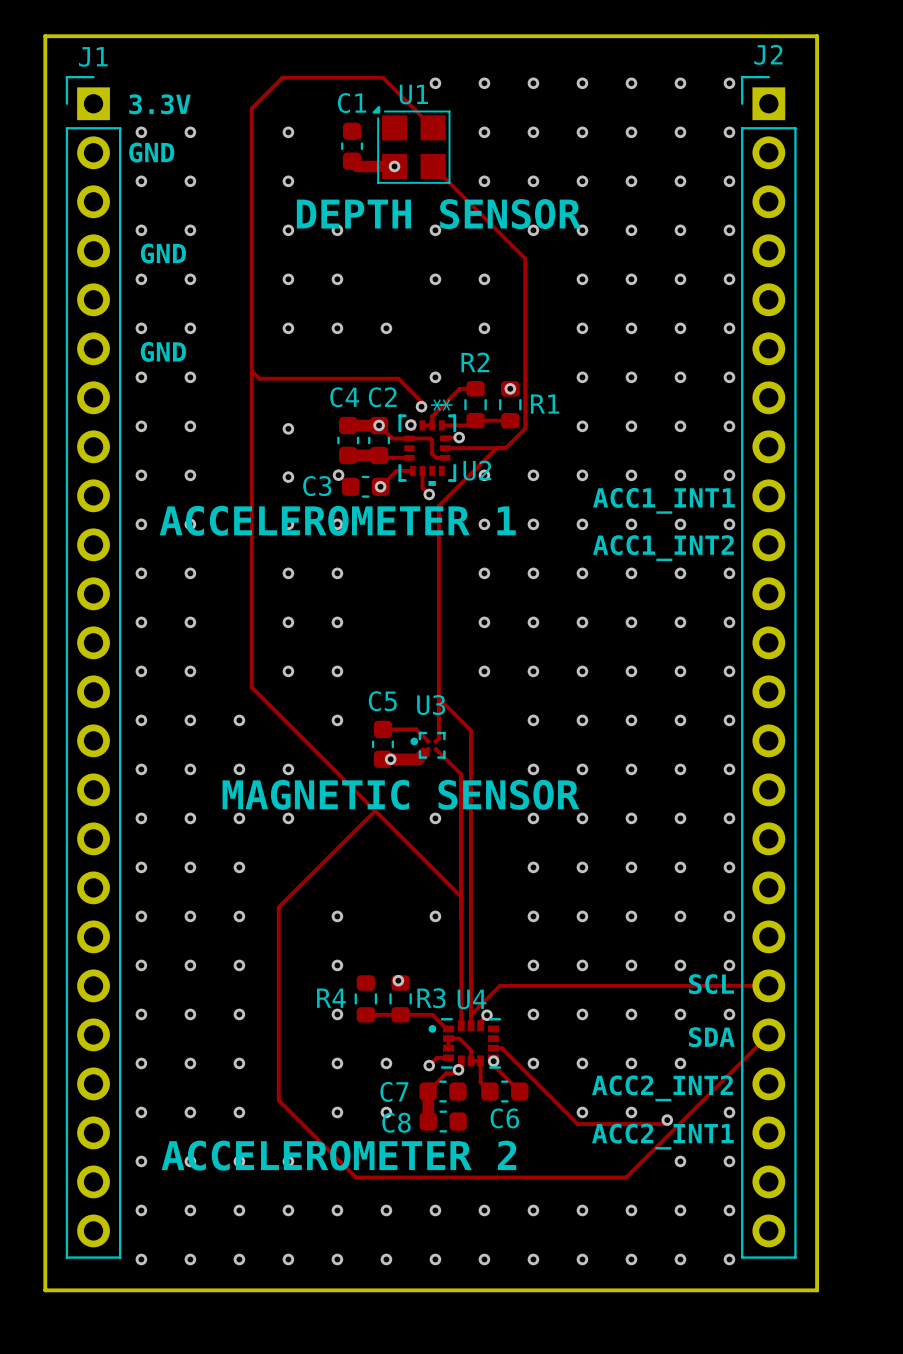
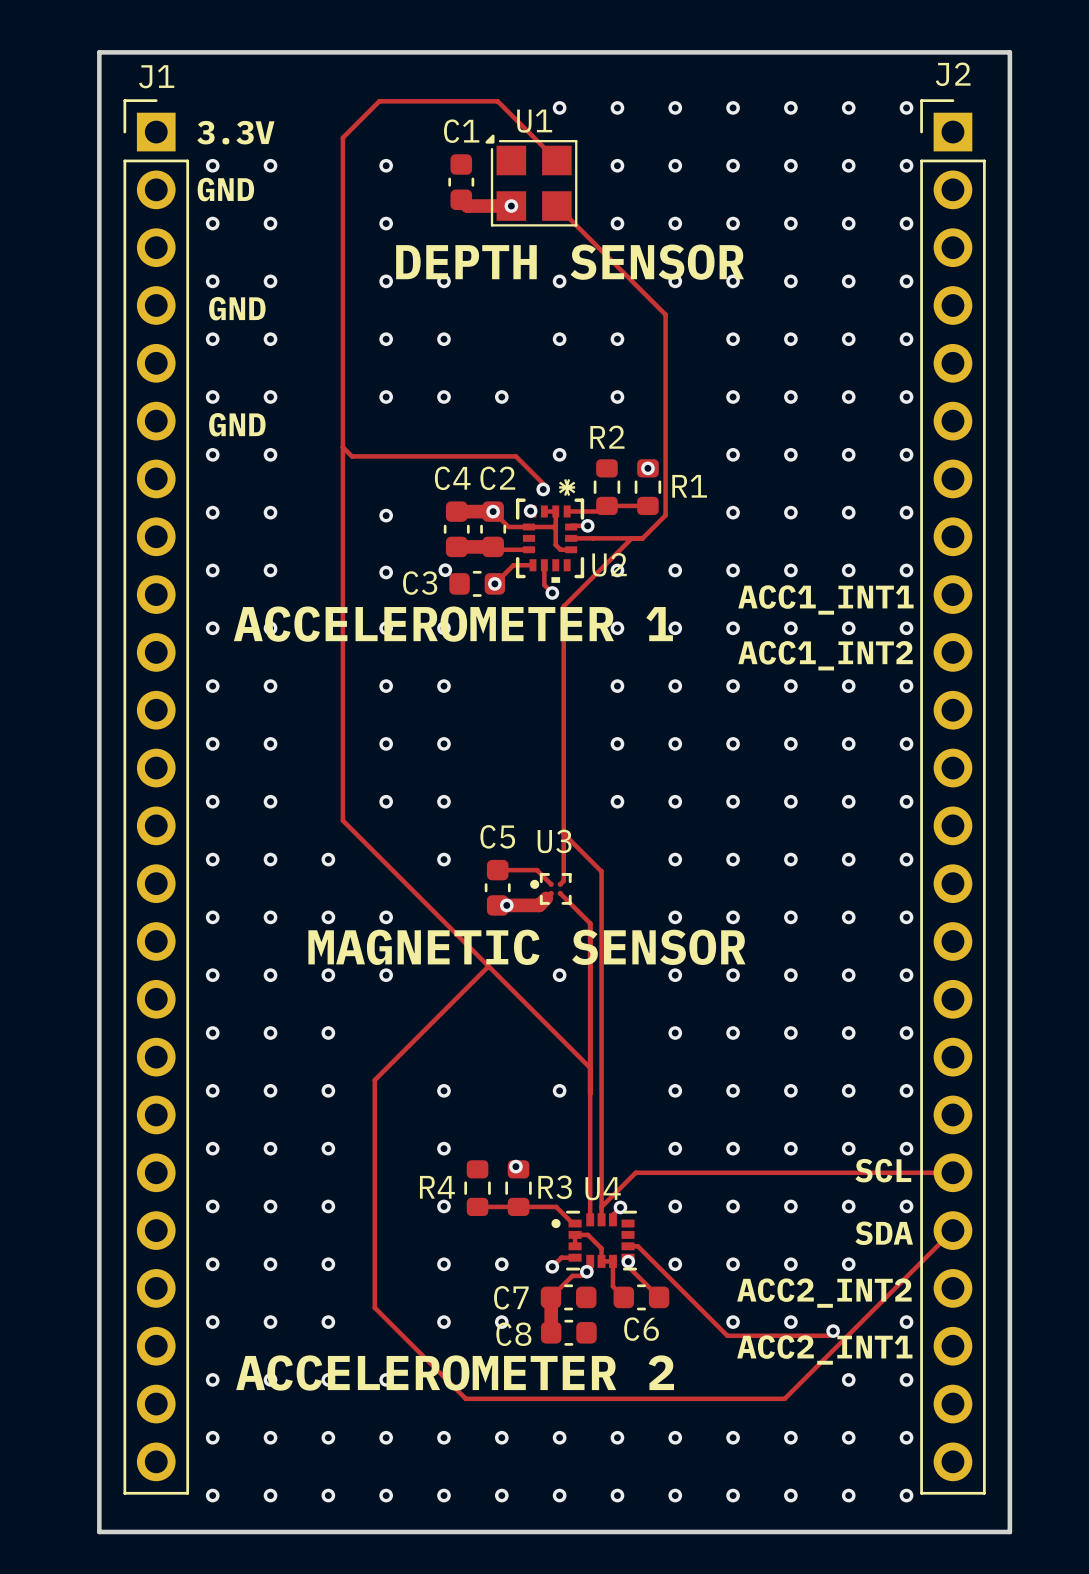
track: (475, 388) (459, 388) (432, 416) (432, 425) -> (555, 529) (555, 511)

